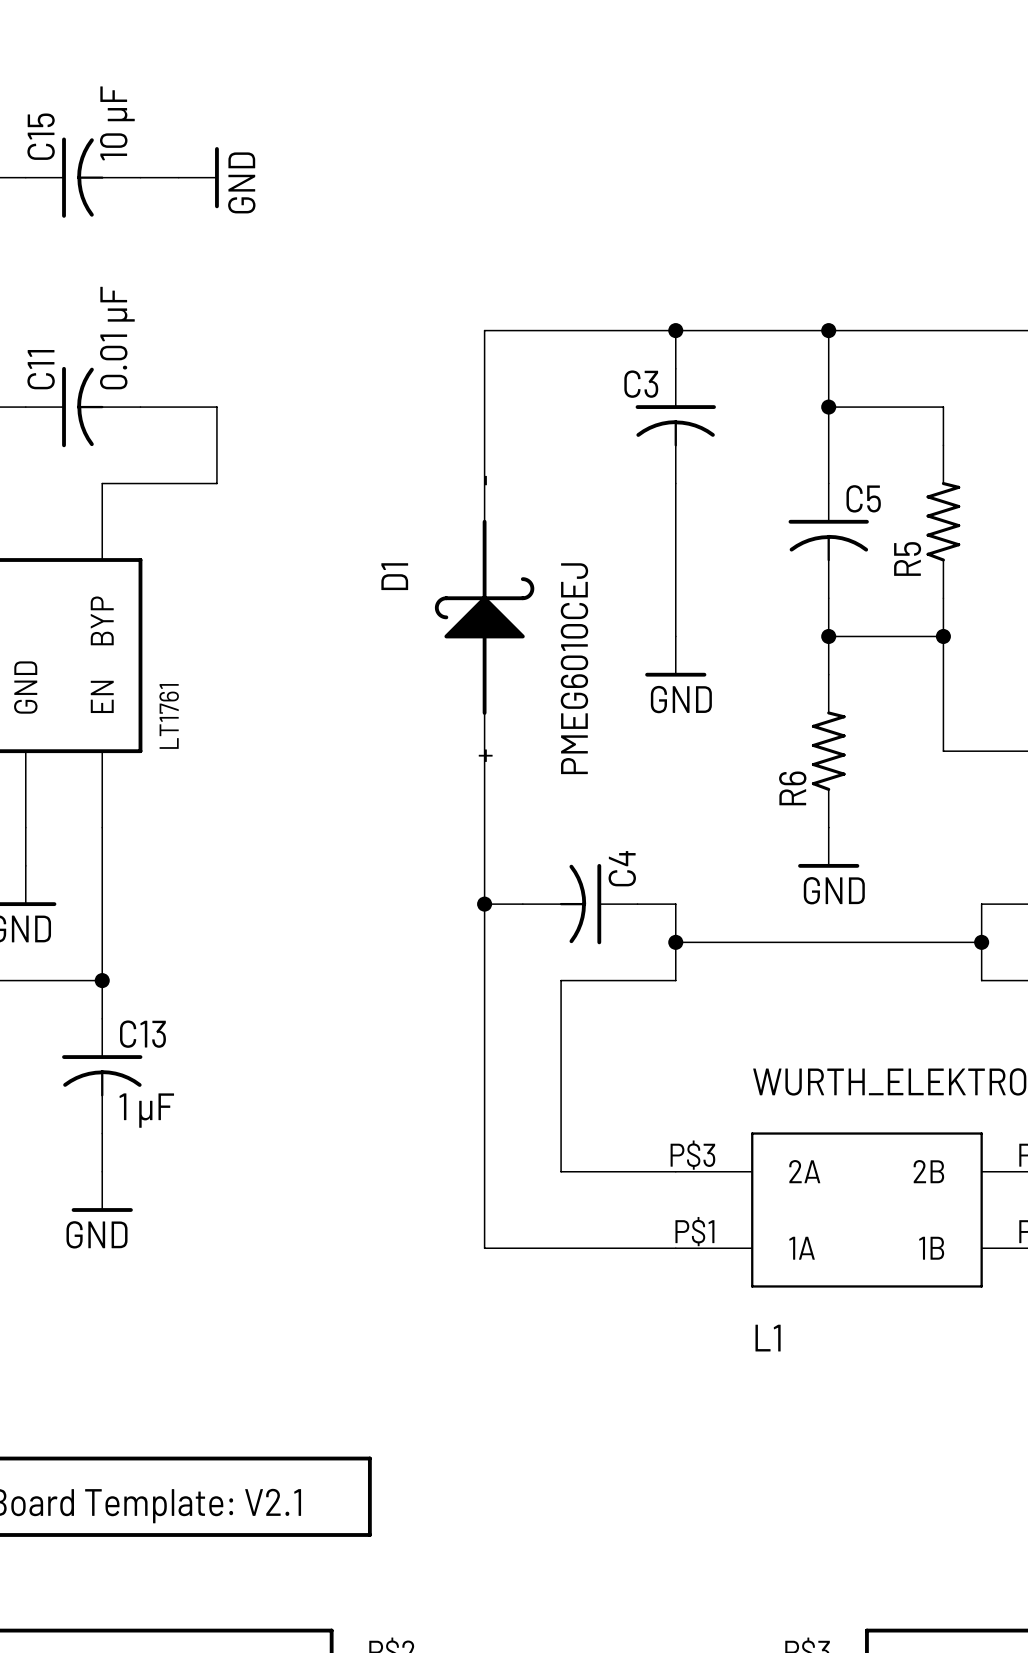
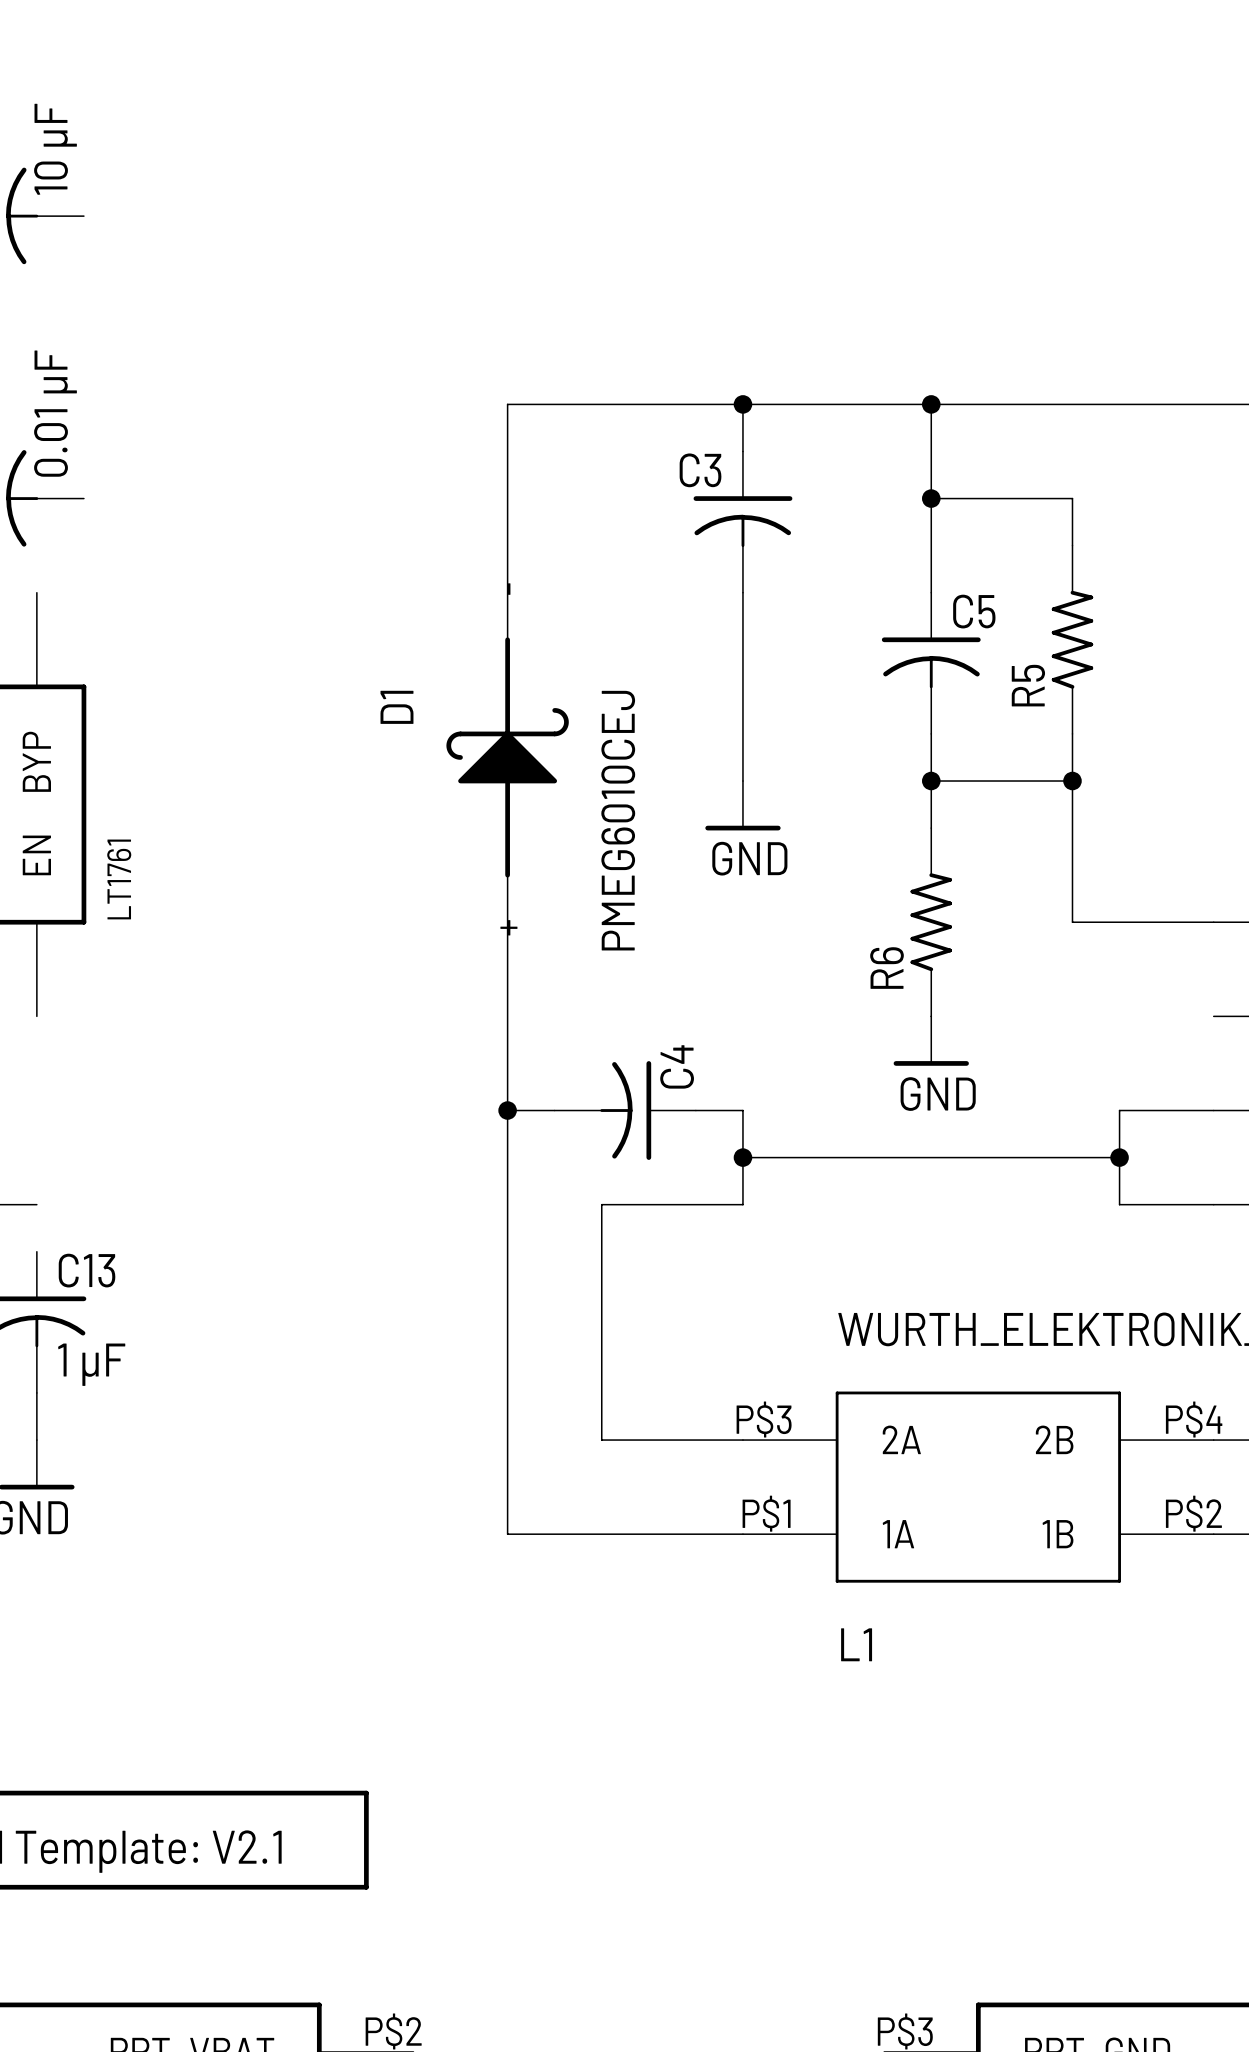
wire: (140, 177) (178, 177) -> none
power symbol: GND (198, 177) -> none
wire: (140, 407) (216, 407) (216, 483) (102, 483) -> none
wire: (102, 827) (102, 1018) -> none
junction: (102, 980) -> none

